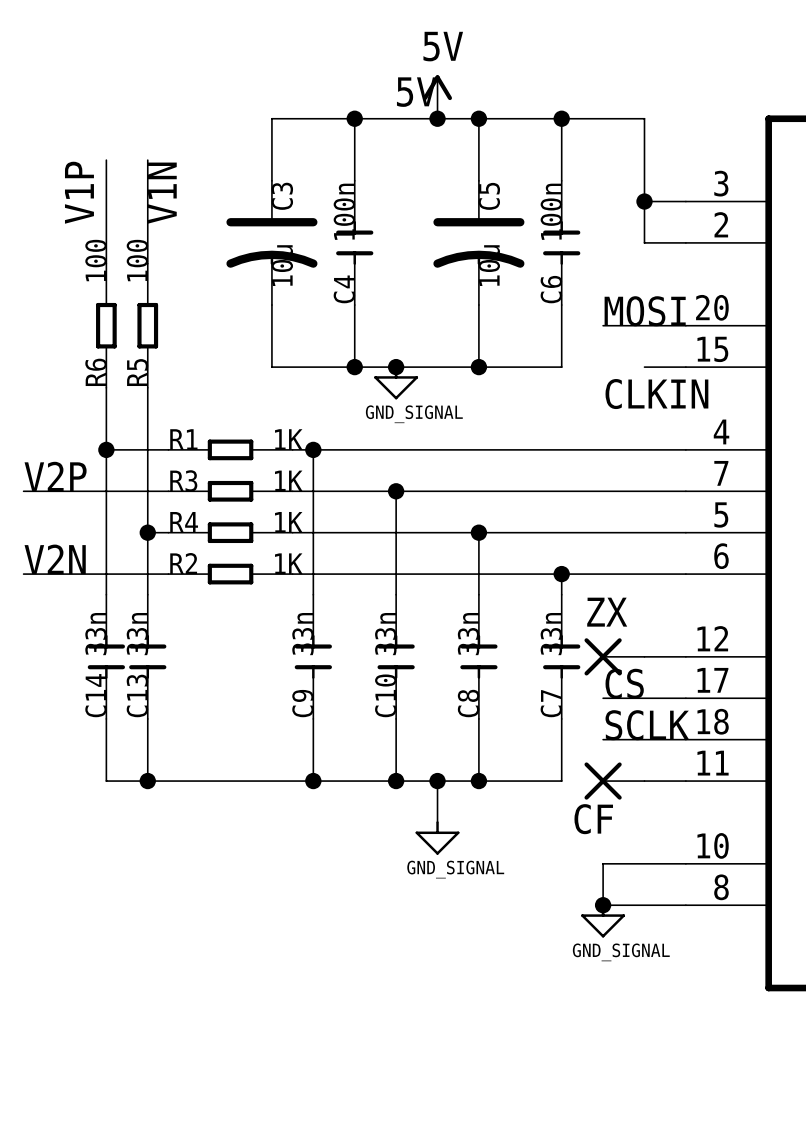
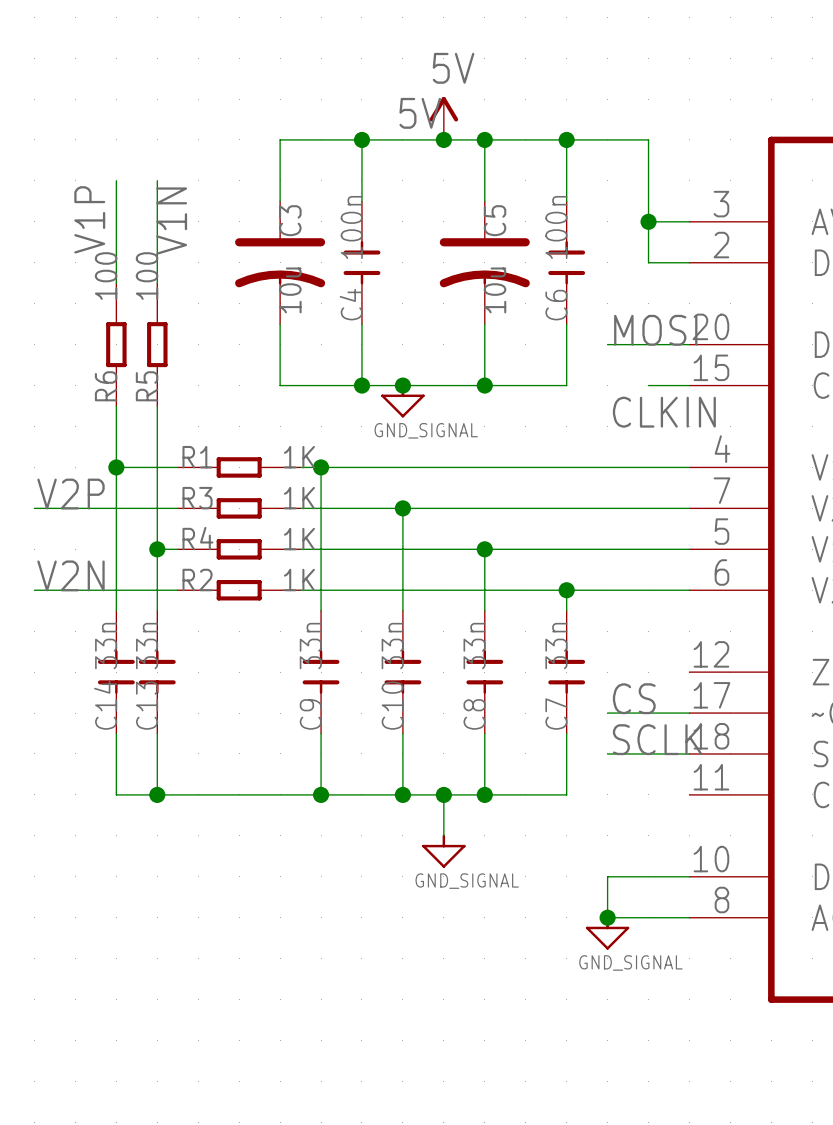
ZX: (614, 656) -> none
wire: (644, 656) (685, 656) -> none
CF: (614, 781) -> none
wire: (644, 781) (685, 781) -> none

